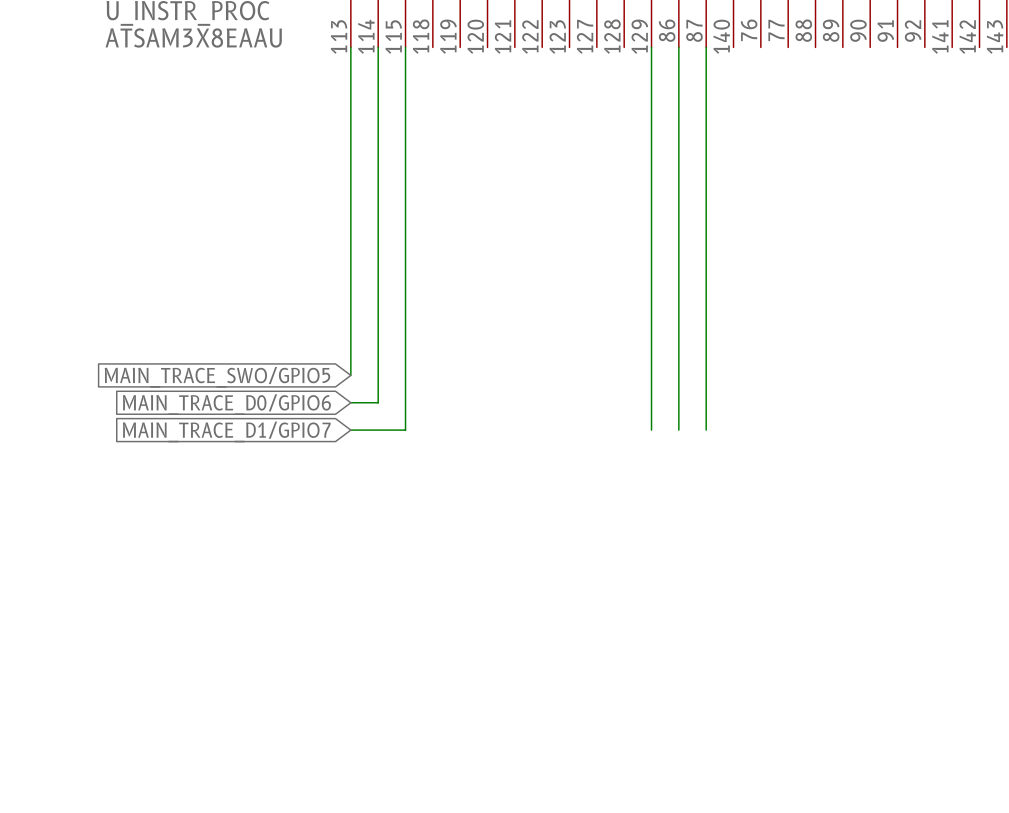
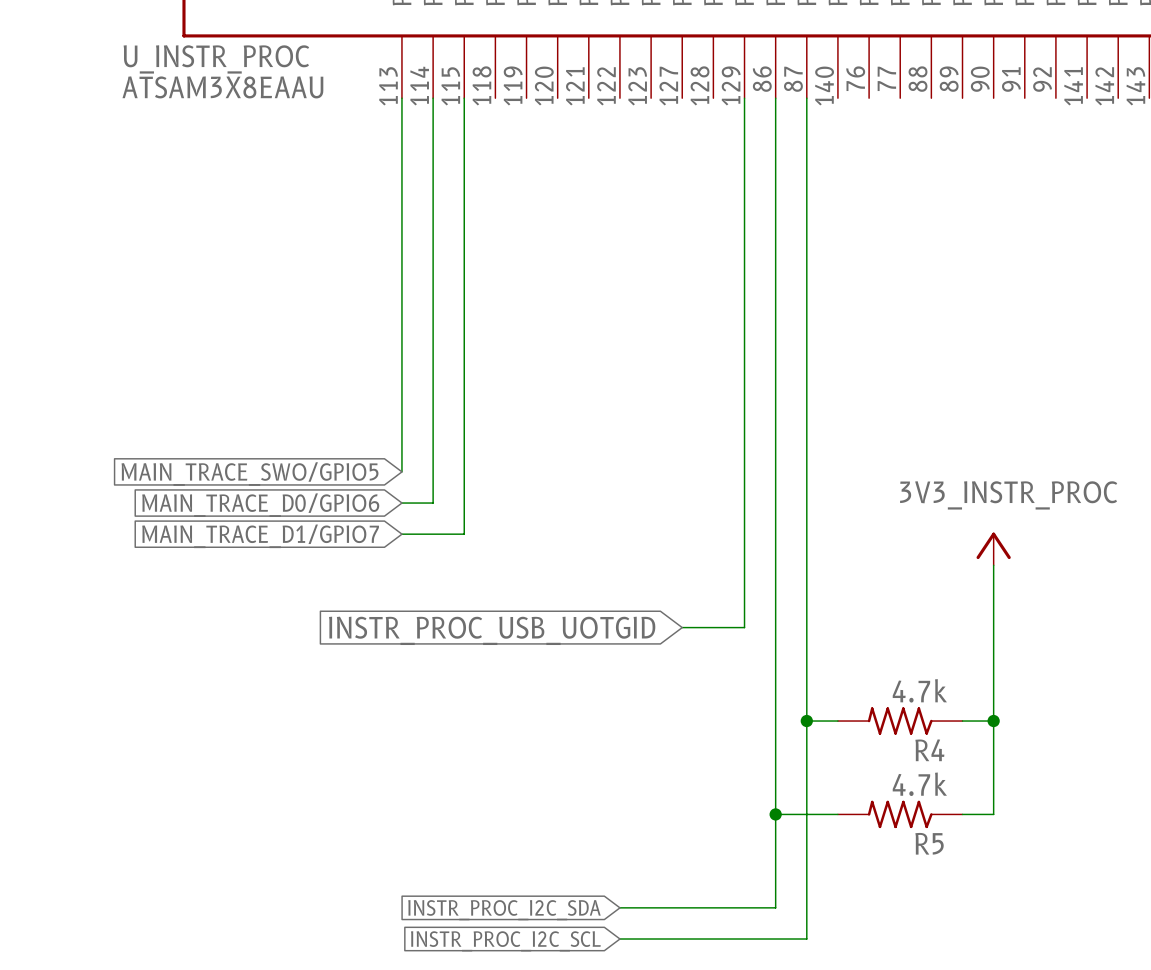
label: none -> 3V3_INSTR_PROC (1008, 495)
wire: none -> (744, 534) (744, 627) (682, 627)
wire: none -> (775, 534) (775, 907) (619, 907)
wire: none -> (806, 534) (806, 939) (619, 939)
power symbol: none -> (993, 548)
wire: none -> (993, 565) (993, 814) (962, 814)
global label: none -> INSTR_PROC_USB_UOTGID (492, 630)
wire: none -> (806, 721) (837, 721)
junction: none -> (806, 721)
R4: none -> 4.7k (900, 721)
wire: none -> (962, 721) (993, 721)
junction: none -> (993, 721)
wire: none -> (775, 814) (837, 814)
junction: none -> (775, 814)
R5: none -> 4.7k (900, 814)
global label: none -> INSTR_PROC_I2C_SDA (504, 910)
global label: none -> INSTR_PROC_I2C_SCL (505, 941)

